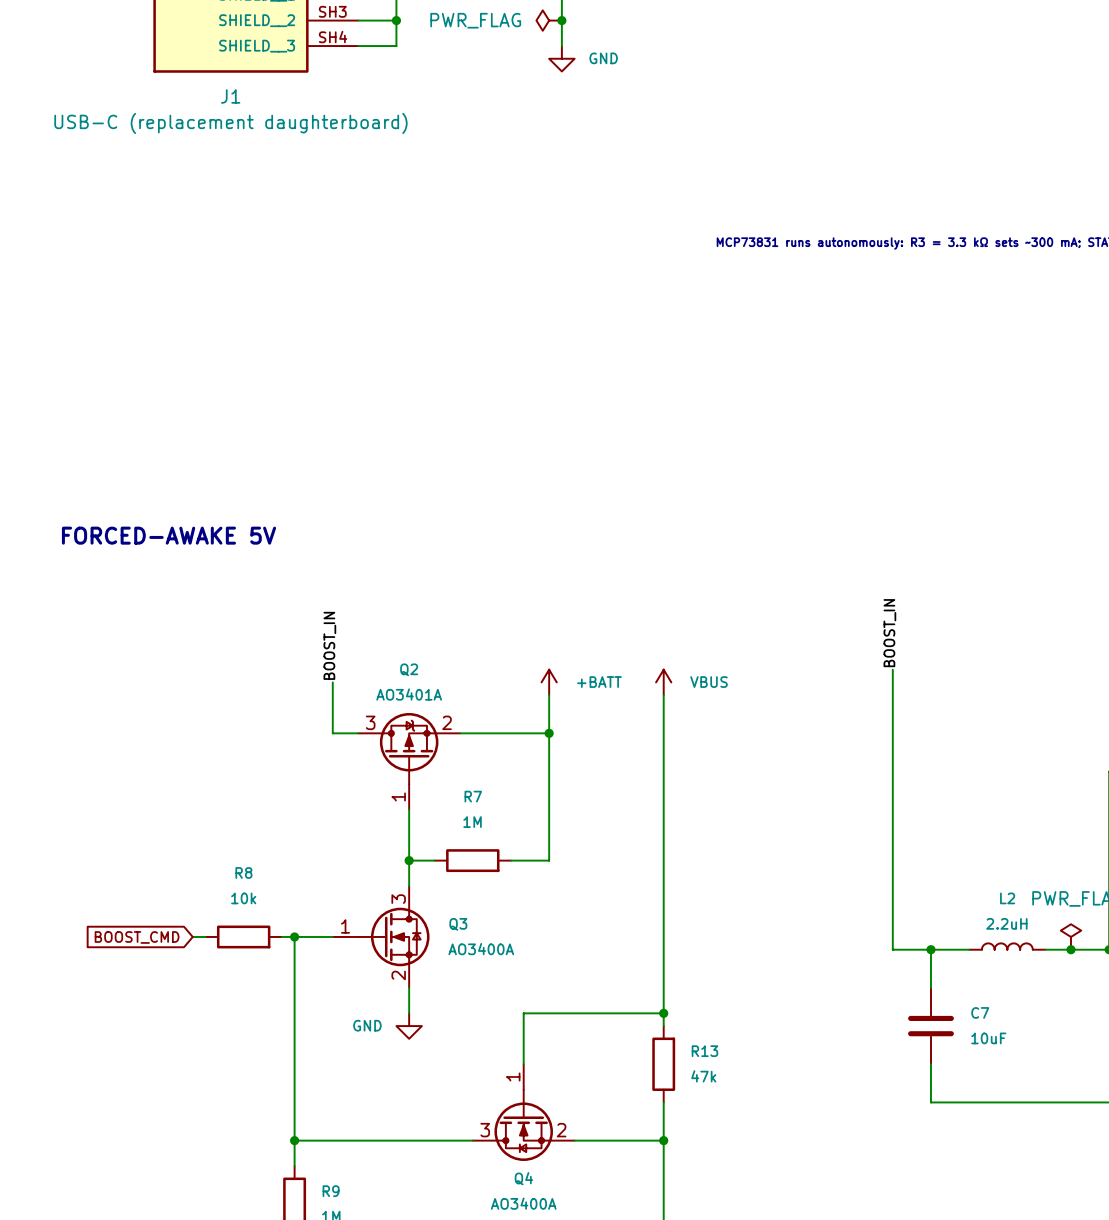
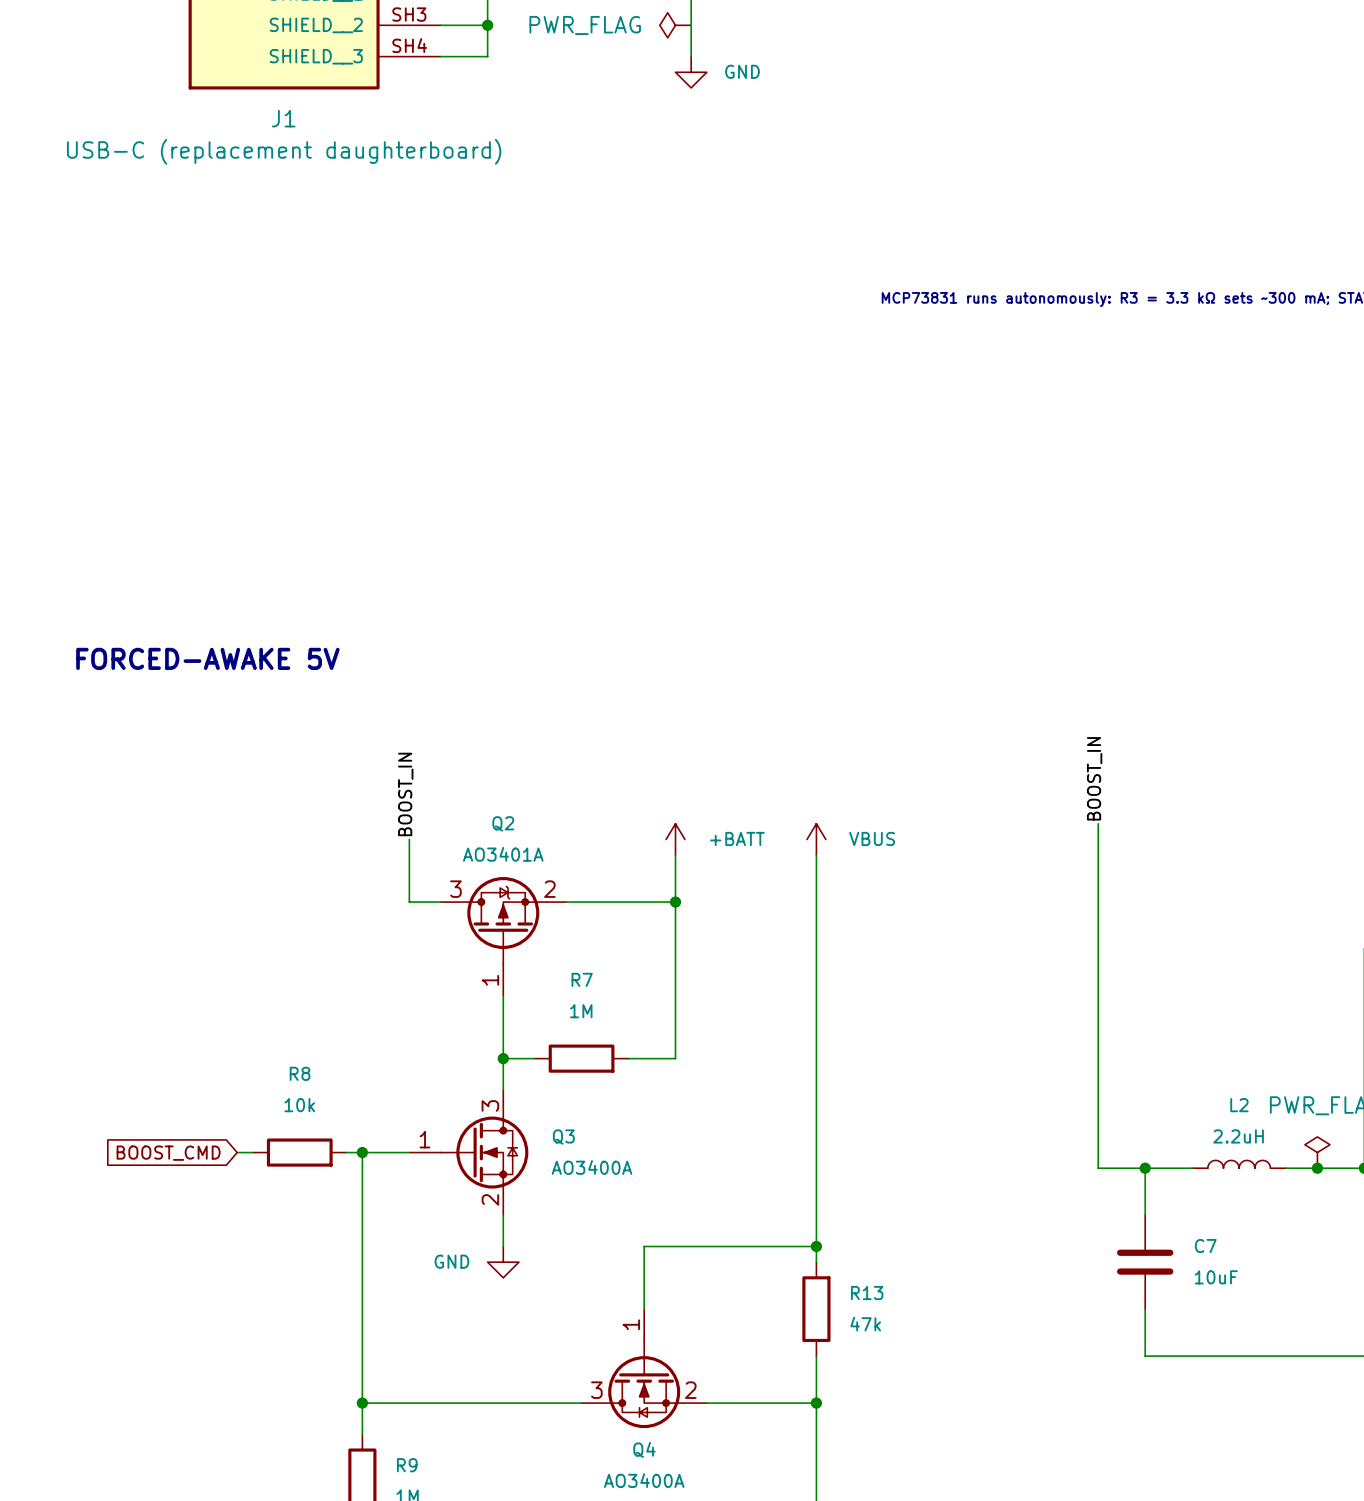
junction: (561, 20) -> none

